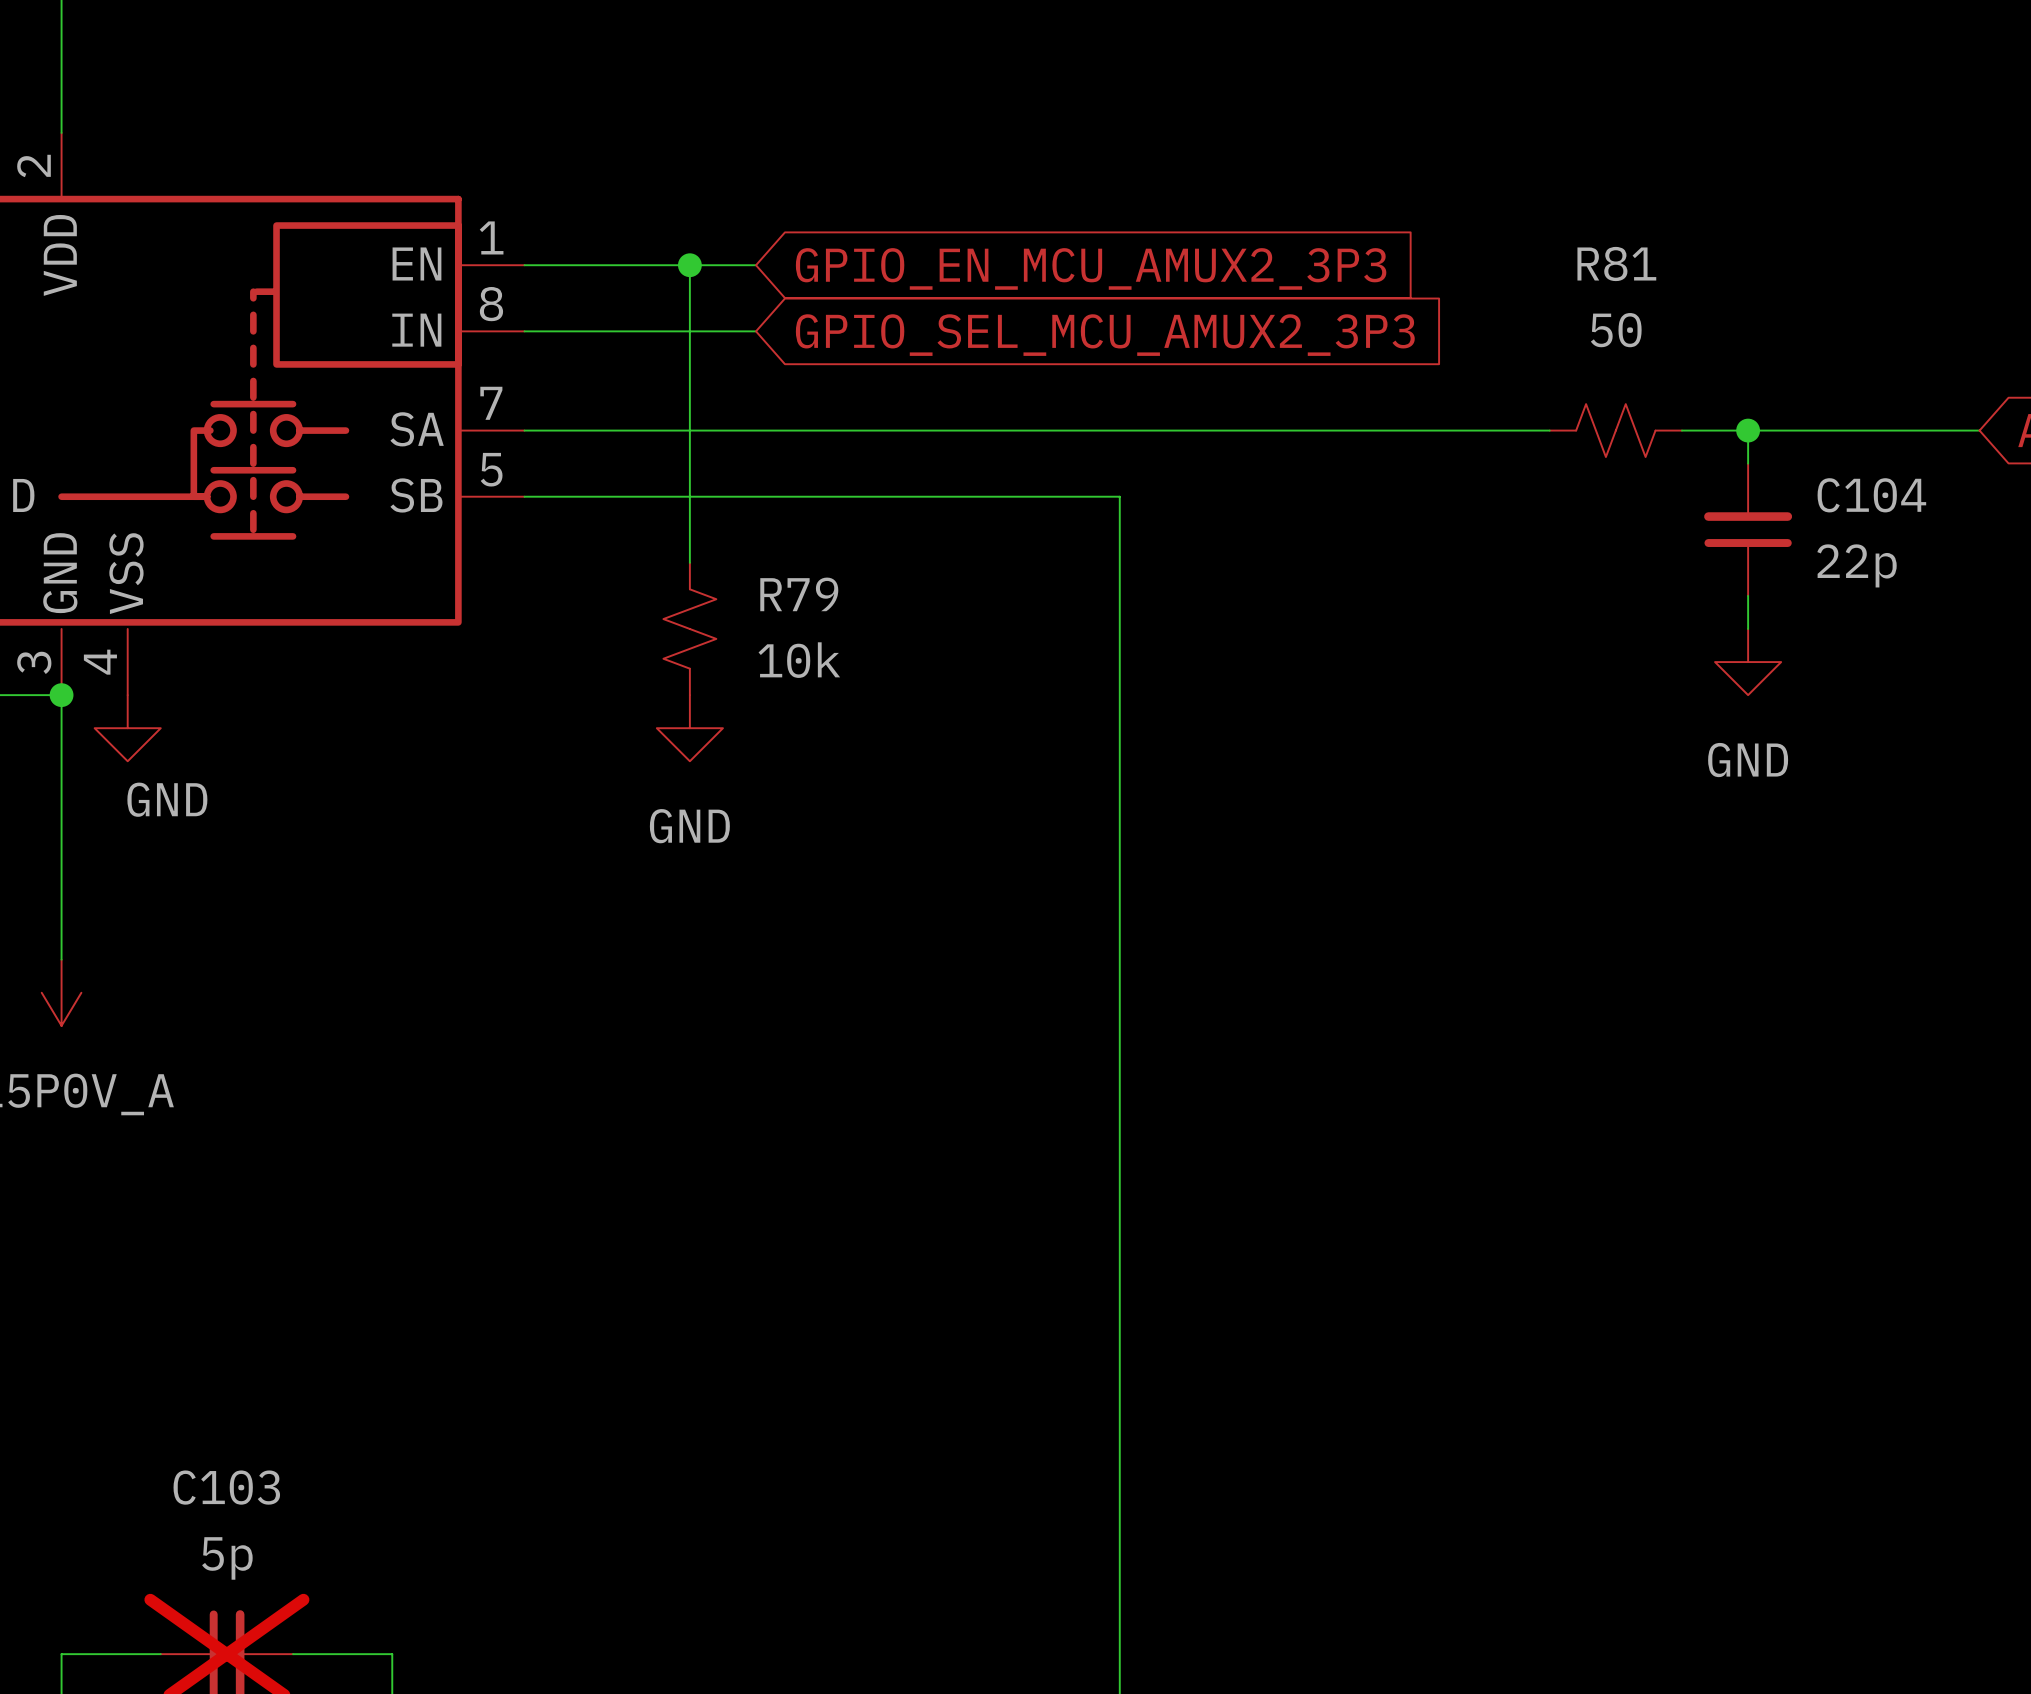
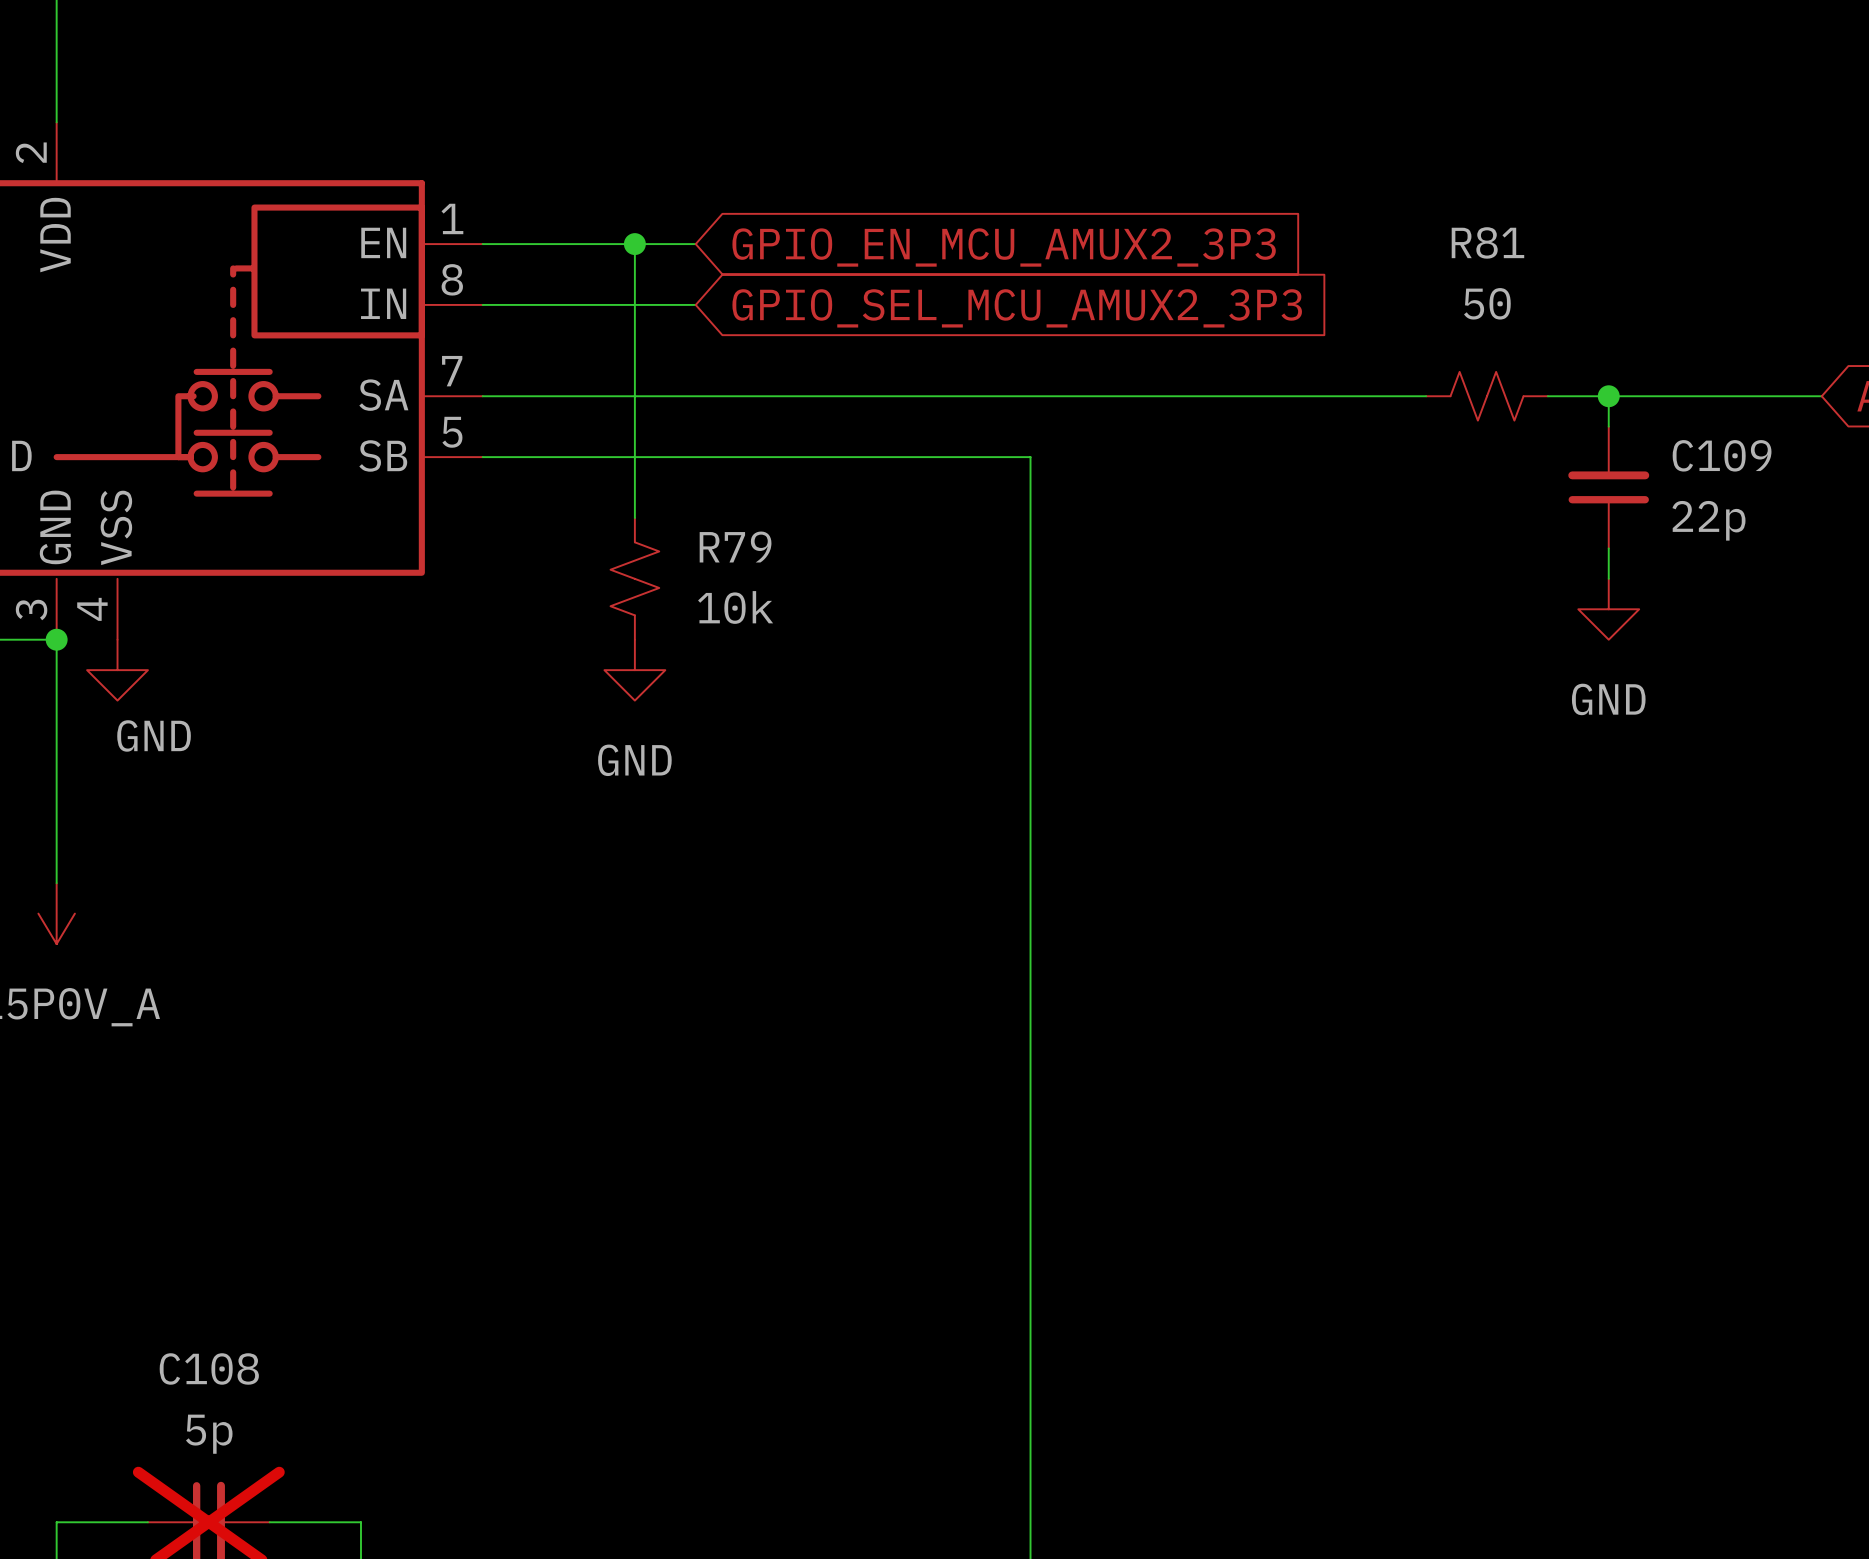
C104 name: C104 (1871, 495) -> C109 (1722, 455)
C103 name: C103 (226, 1487) -> C108 (209, 1368)

